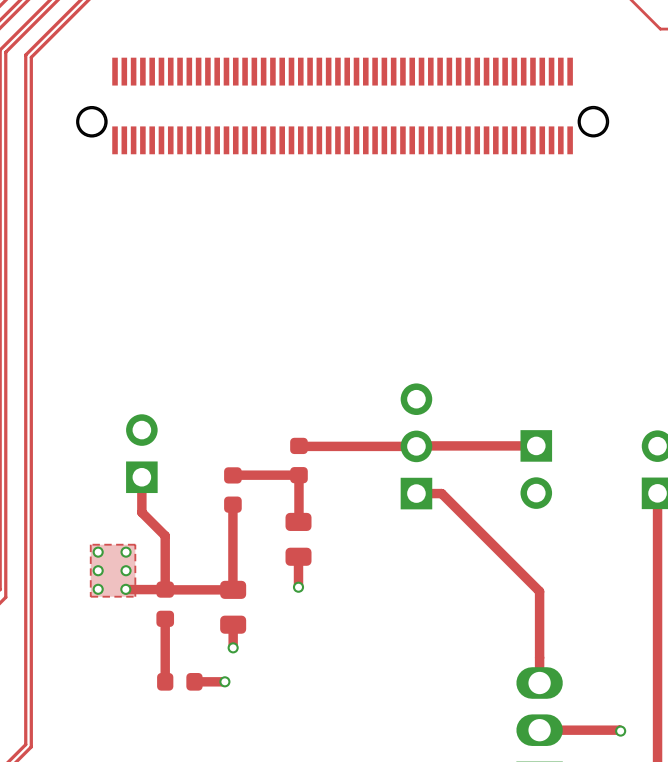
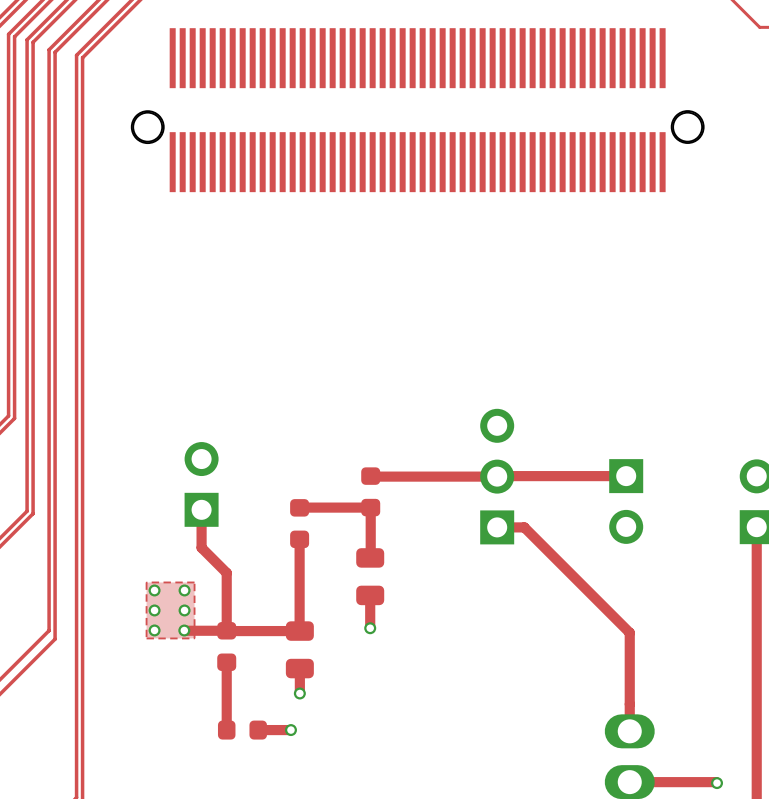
part footprint: [78, 57, 607, 155] -> [133, 28, 703, 193]

